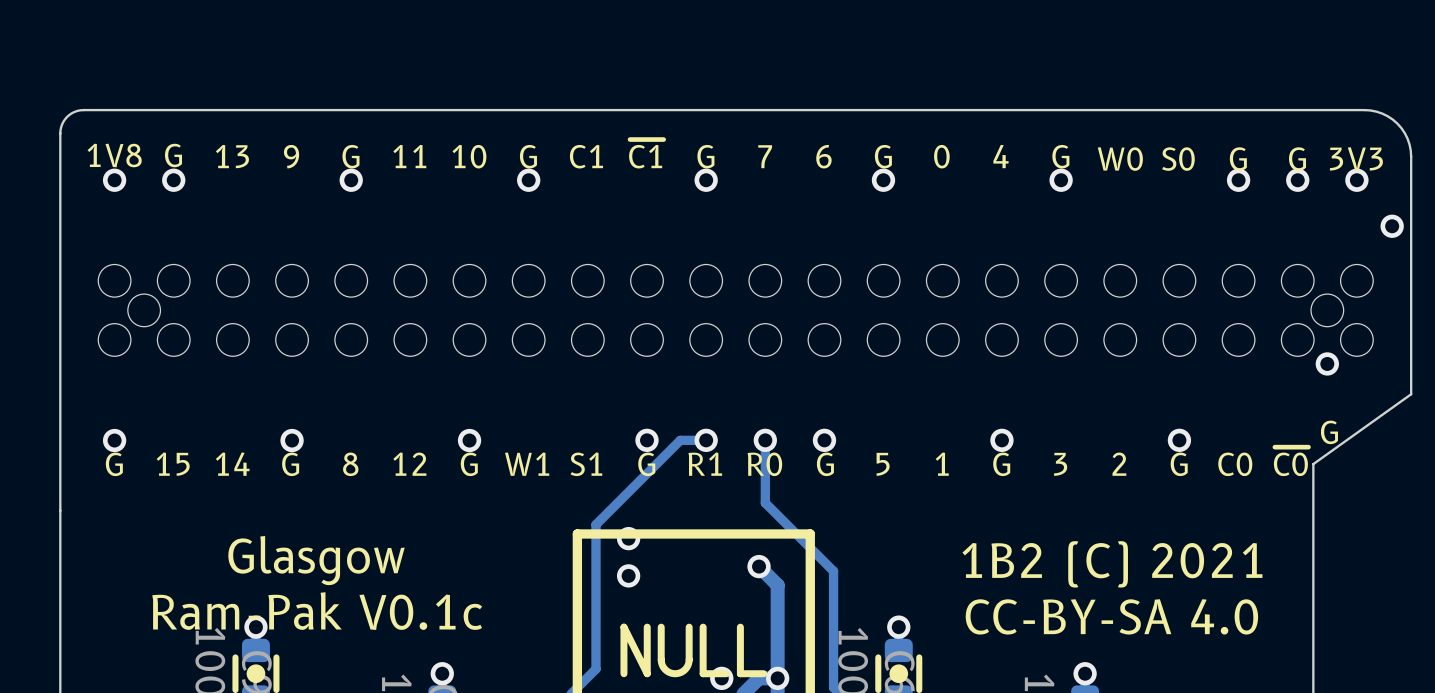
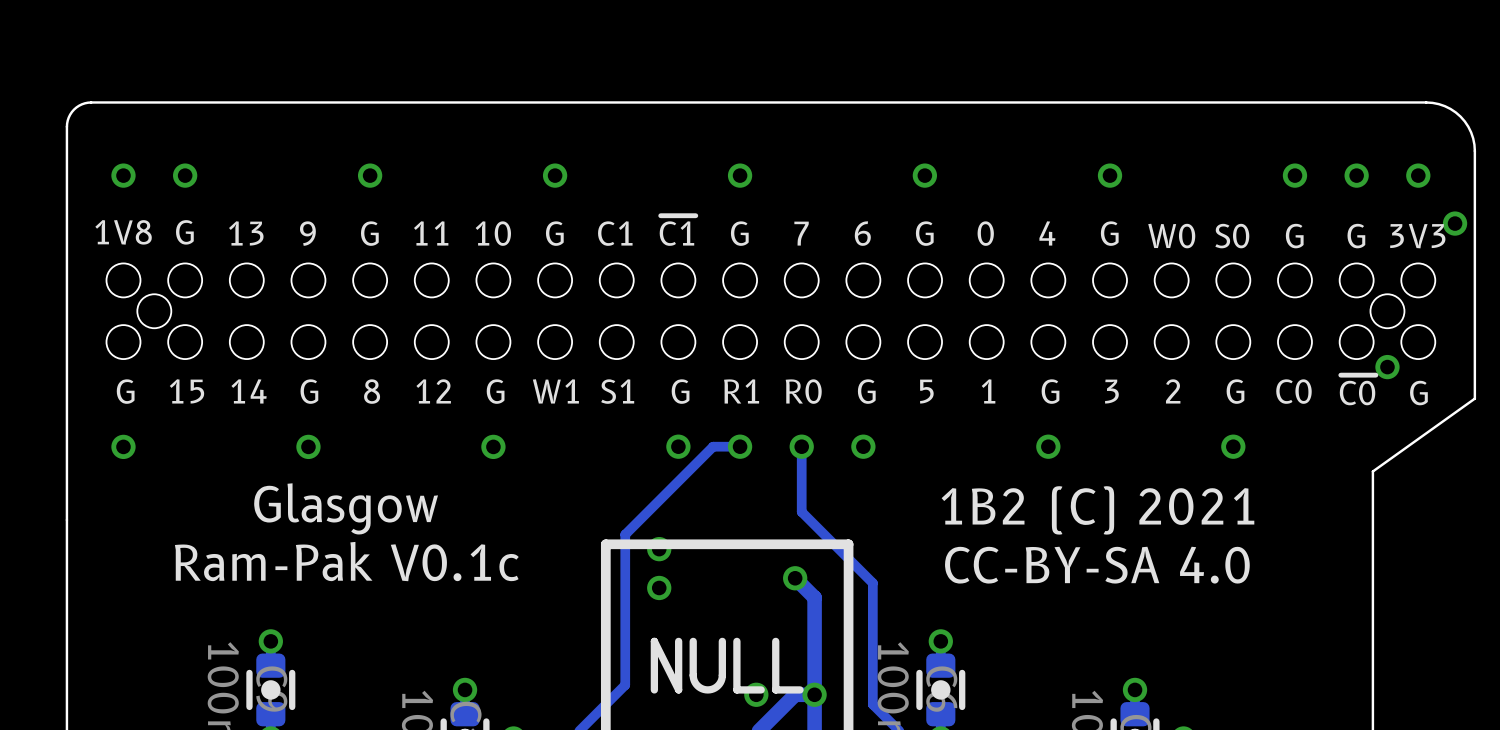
text position: ~{C1} (646, 153) -> ~{C1} (677, 230)
text position: 1V8 (114, 155) -> 1V8 (123, 232)
text position: G (173, 155) -> G (184, 232)
text position: 13 (232, 156) -> 13 (246, 233)
text position: 9 (291, 156) -> 9 (307, 233)
text position: G (350, 156) -> G (369, 233)
text position: 11 (409, 156) -> 11 (431, 233)
text position: 10 (469, 156) -> 10 (493, 233)
text position: G (528, 156) -> G (554, 233)
text position: C1 (586, 156) -> C1 (615, 233)
text position: G (705, 156) -> G (739, 233)
text position: 7 (765, 156) -> 7 (801, 233)
text position: 6 (823, 156) -> 6 (862, 233)
text position: G (883, 156) -> G (924, 233)
text position: 0 (941, 156) -> 0 (985, 233)
text position: 4 (1001, 156) -> 4 (1047, 233)
text position: G (1060, 156) -> G (1109, 233)
text position: W0 (1120, 159) -> W0 (1171, 236)
text position: S0 (1178, 159) -> S0 (1232, 236)
text: G (1238, 159) -> none
text: G (1297, 159) -> none
text position: 3V3 (1356, 159) -> 3V3 (1417, 236)
text: none -> G (1294, 236)
text: none -> G (1356, 236)
text: none -> G (1235, 391)
text position: G (1329, 432) -> G (1418, 393)
text position: ~{C0} (1291, 461) -> ~{C0} (1357, 390)
text position: G (114, 464) -> G (125, 391)
text position: 15 (173, 464) -> 15 (186, 391)
text position: 14 (232, 464) -> 14 (249, 391)
text position: G (290, 464) -> G (309, 391)
text position: 8 (350, 464) -> 8 (372, 391)
text position: 12 (409, 464) -> 12 (433, 391)
text position: G (469, 464) -> G (495, 391)
text position: W1 (527, 464) -> W1 (555, 391)
text position: S1 (586, 464) -> S1 (617, 391)
text position: G (646, 464) -> G (680, 391)
text position: R1 (705, 464) -> R1 (741, 391)
text position: R0 (764, 464) -> R0 (803, 391)
text position: G (825, 464) -> G (866, 391)
text position: 5 (883, 464) -> 5 (926, 391)
text position: 1 (942, 464) -> 1 (988, 391)
text position: G (1001, 464) -> G (1050, 391)
text position: 3 (1060, 464) -> 3 (1111, 391)
text position: 2 (1119, 464) -> 2 (1173, 391)
text: G (1179, 464) -> none
text position: C0 (1235, 464) -> C0 (1293, 391)
text position: Glasgow (316, 560) -> Glasgow (346, 508)
text position: 1B2 (C) 2021 (1112, 564) -> 1B2 (C) 2021 (1097, 510)
text position: Ram-Pak V0.1c (317, 611) -> Ram-Pak V0.1c (346, 561)
text position: CC-BY-SA 4.0 (1111, 616) -> CC-BY-SA 4.0 (1097, 565)

